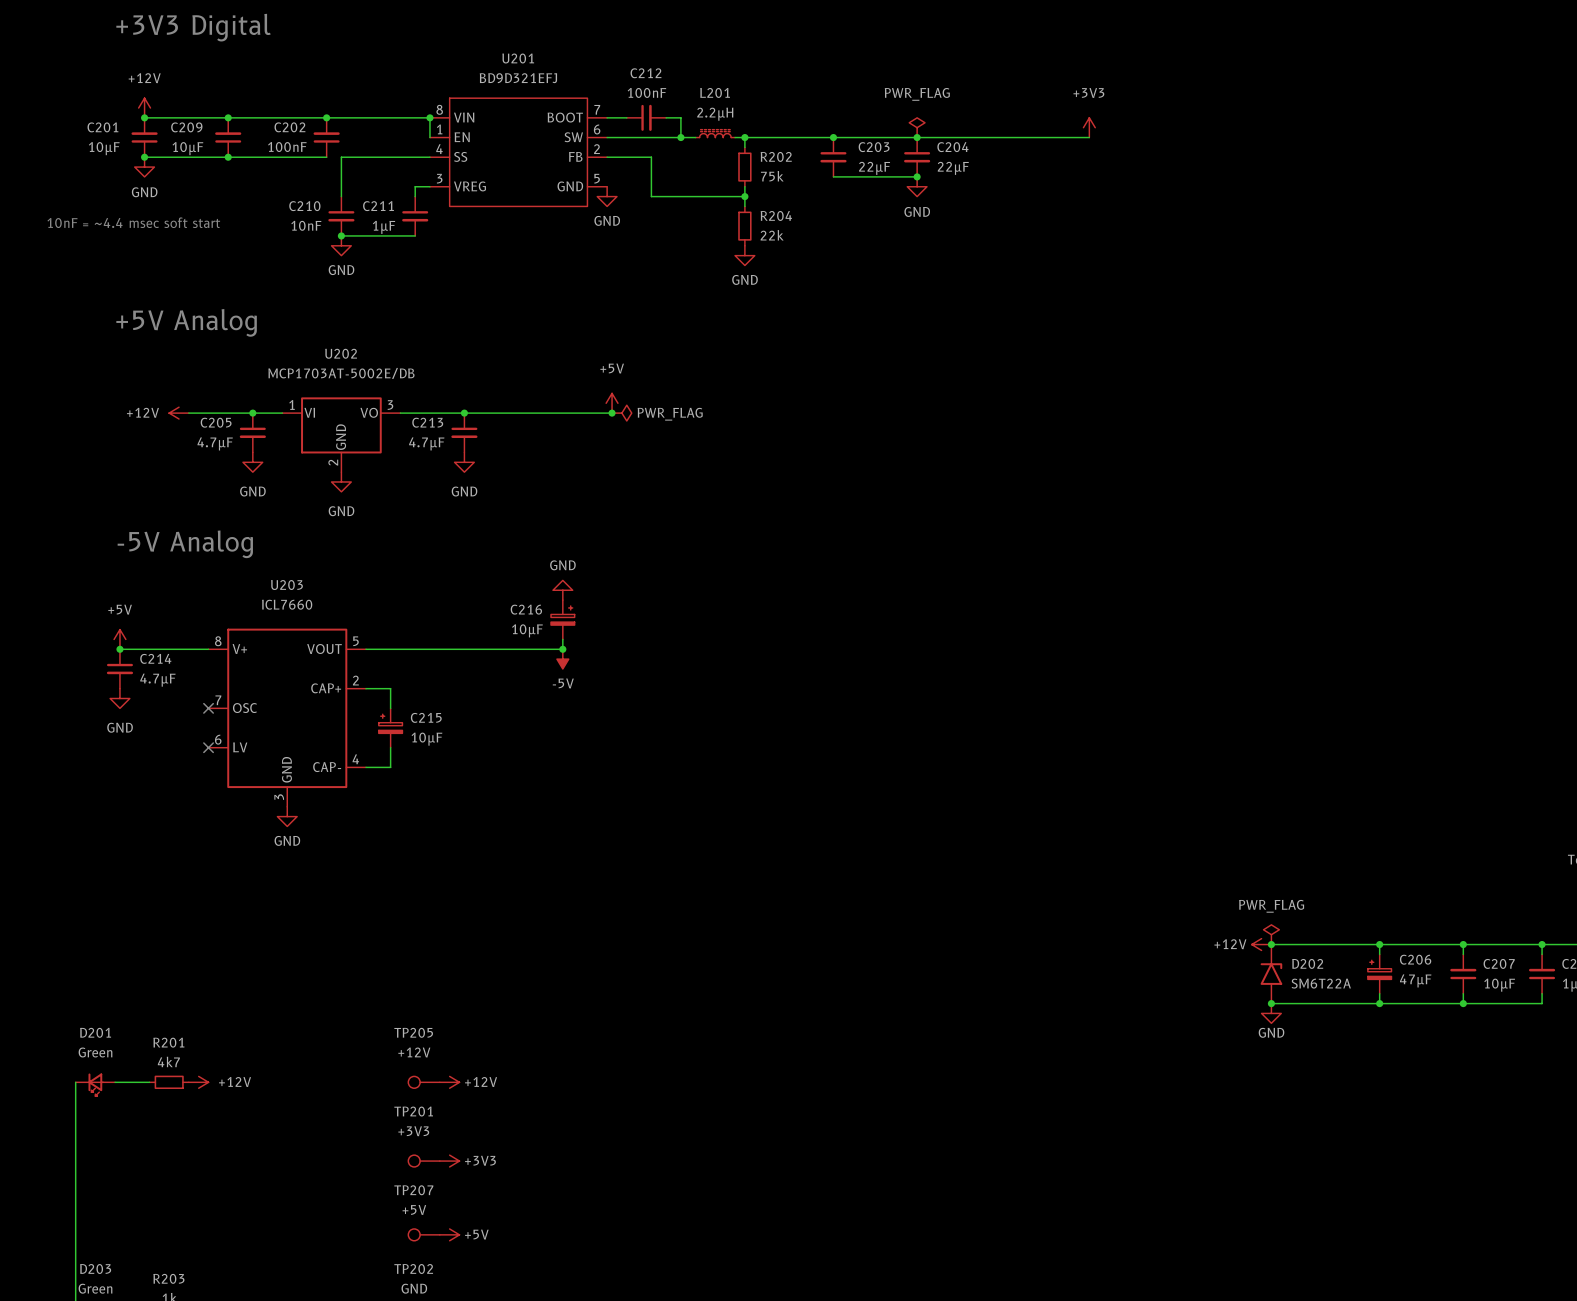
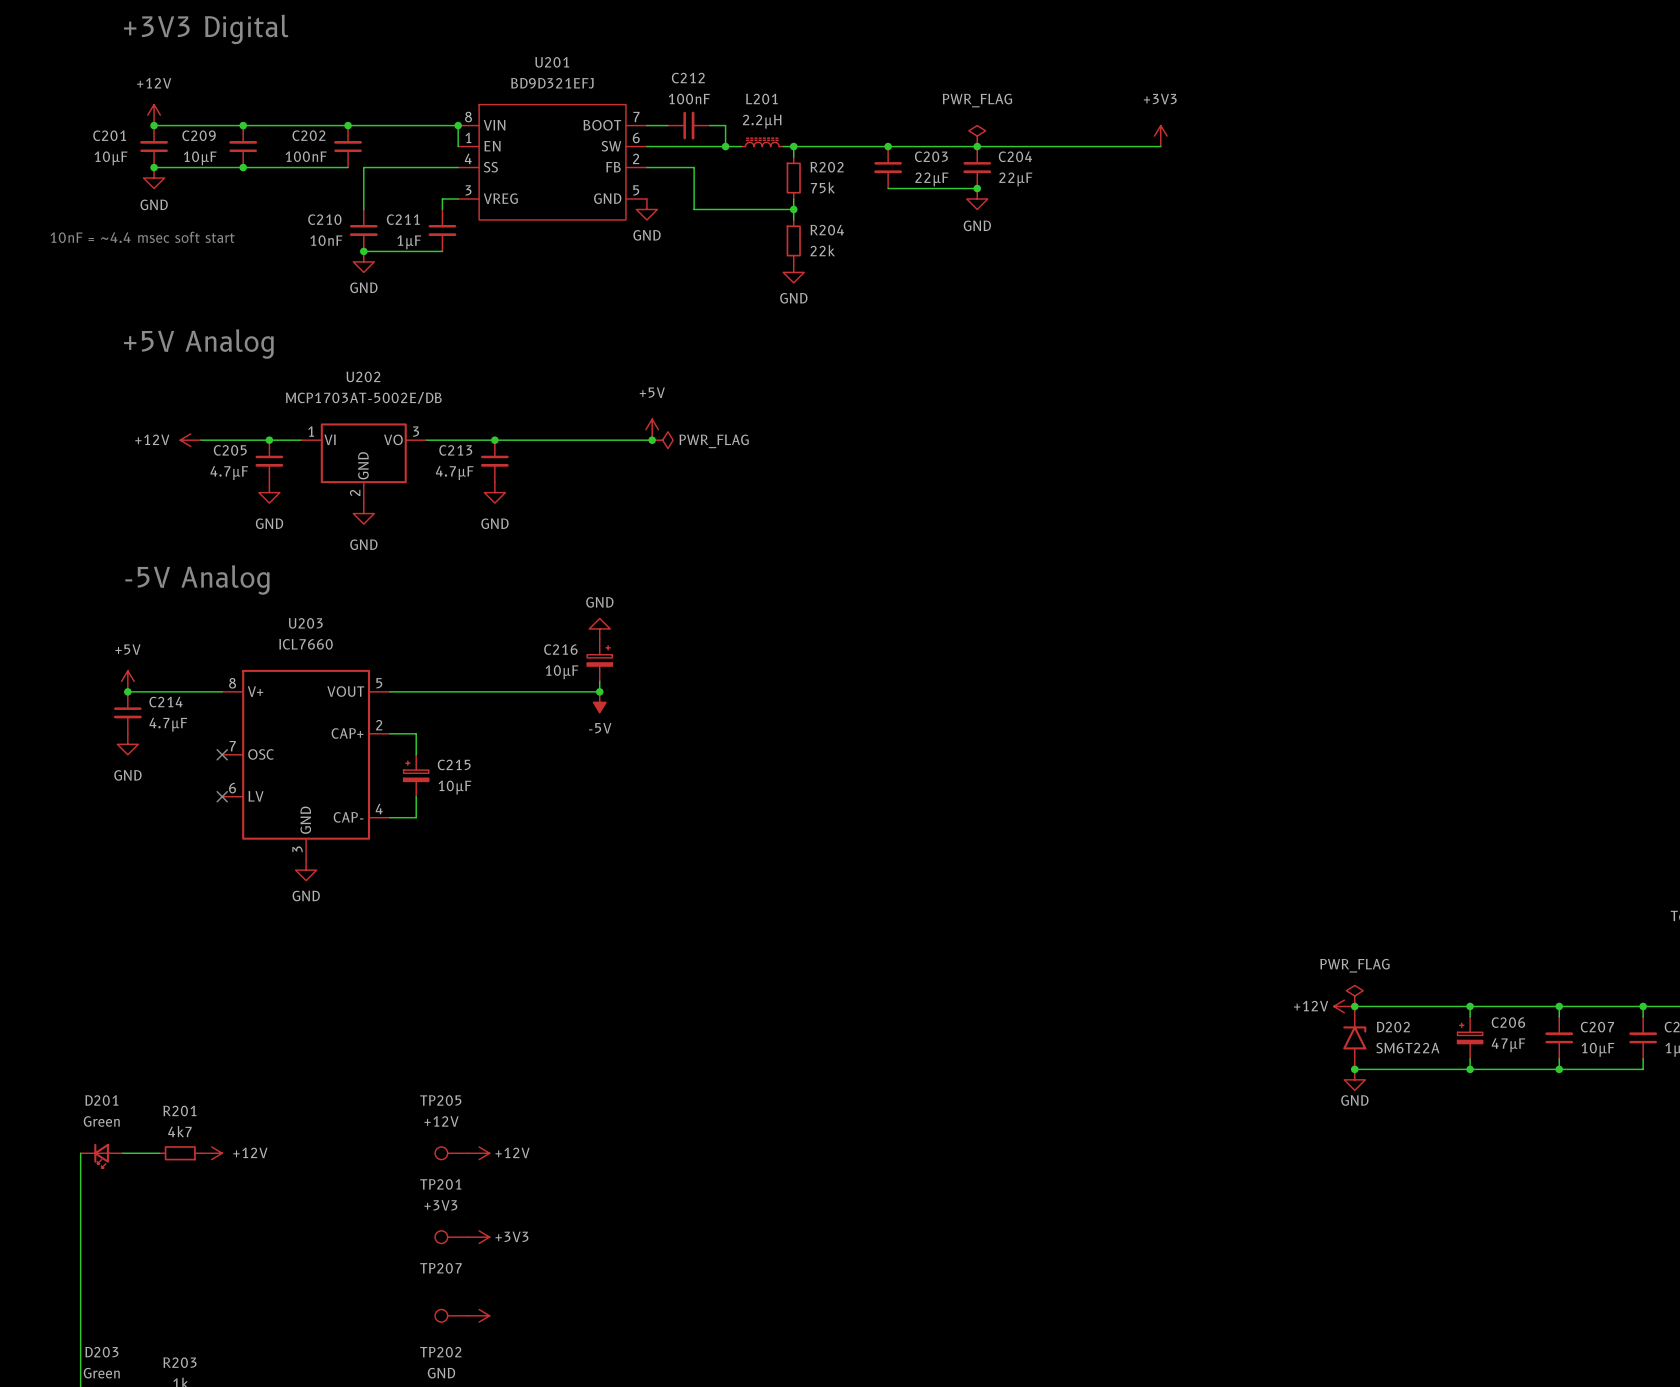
TP207 value: +5V (414, 1209) -> none
power symbol text: +5V (476, 1234) -> none

